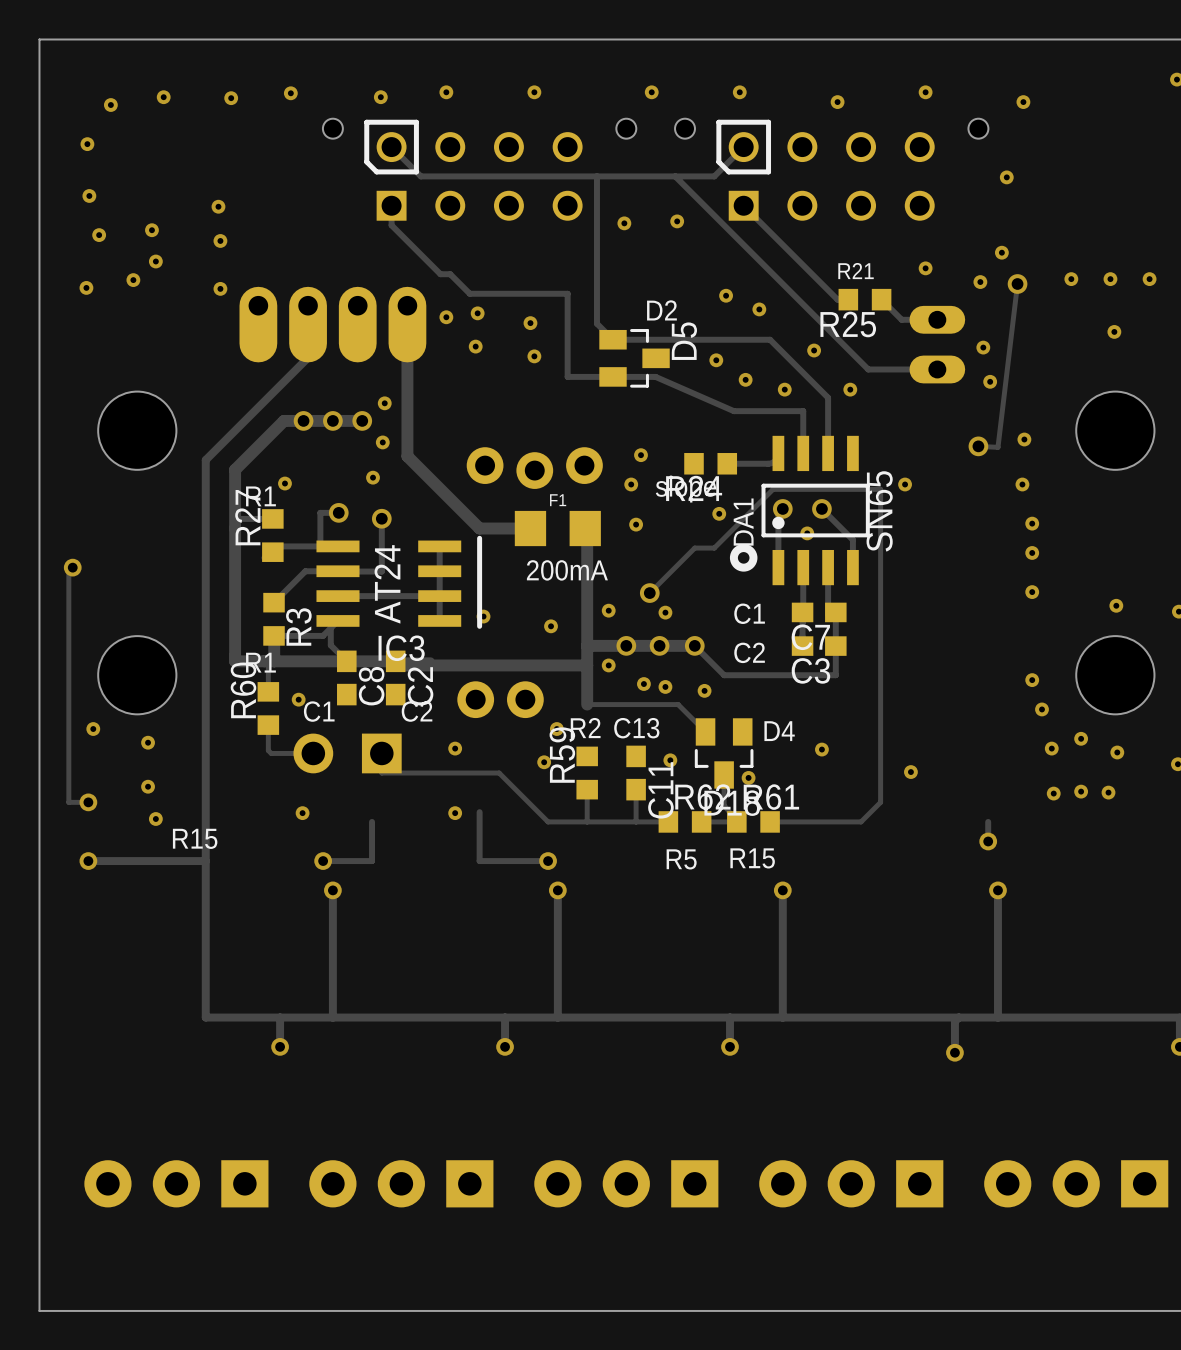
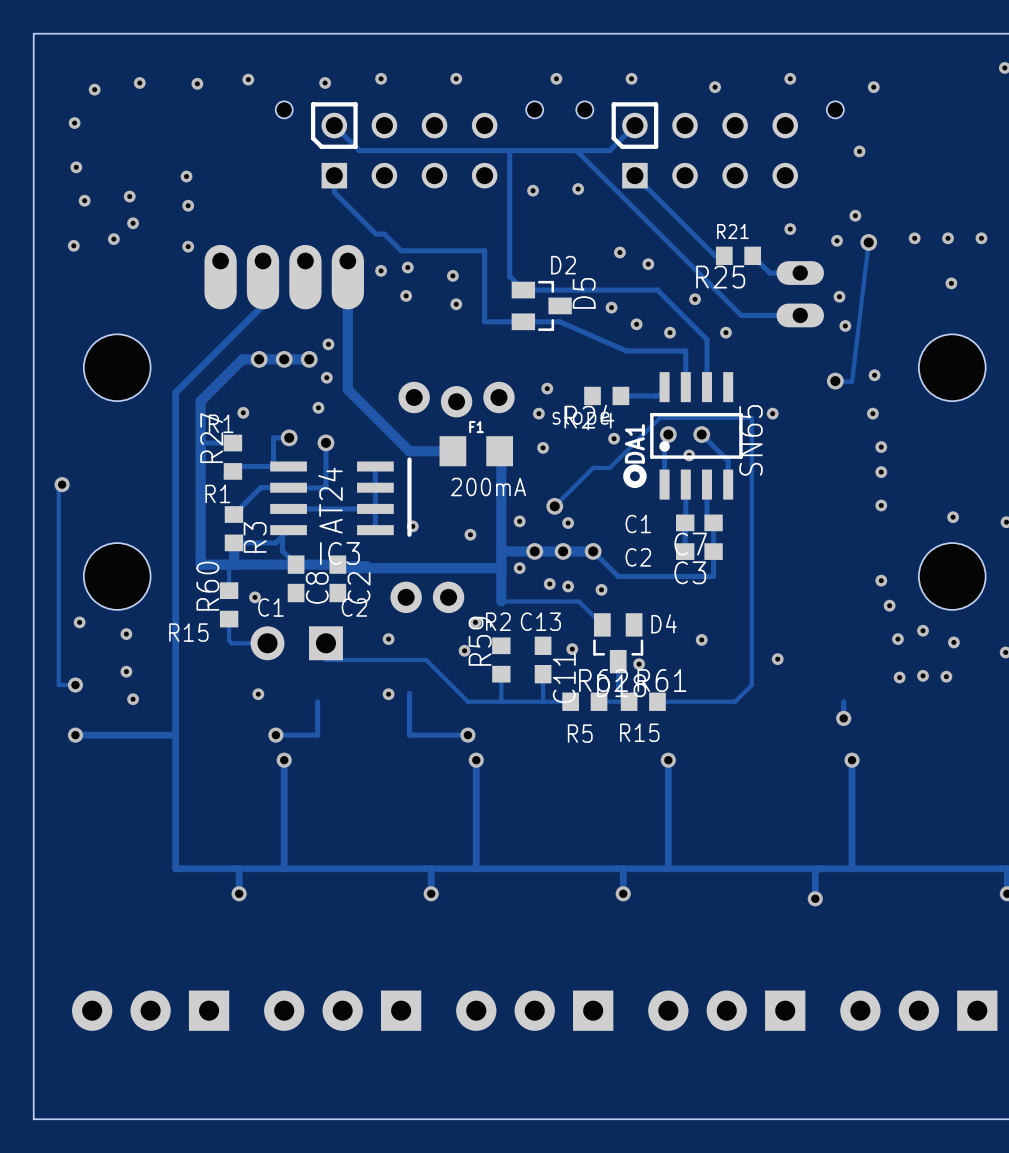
text position: R1 (260, 662) -> R1 (217, 493)
text position: R15 (195, 838) -> R15 (188, 632)

